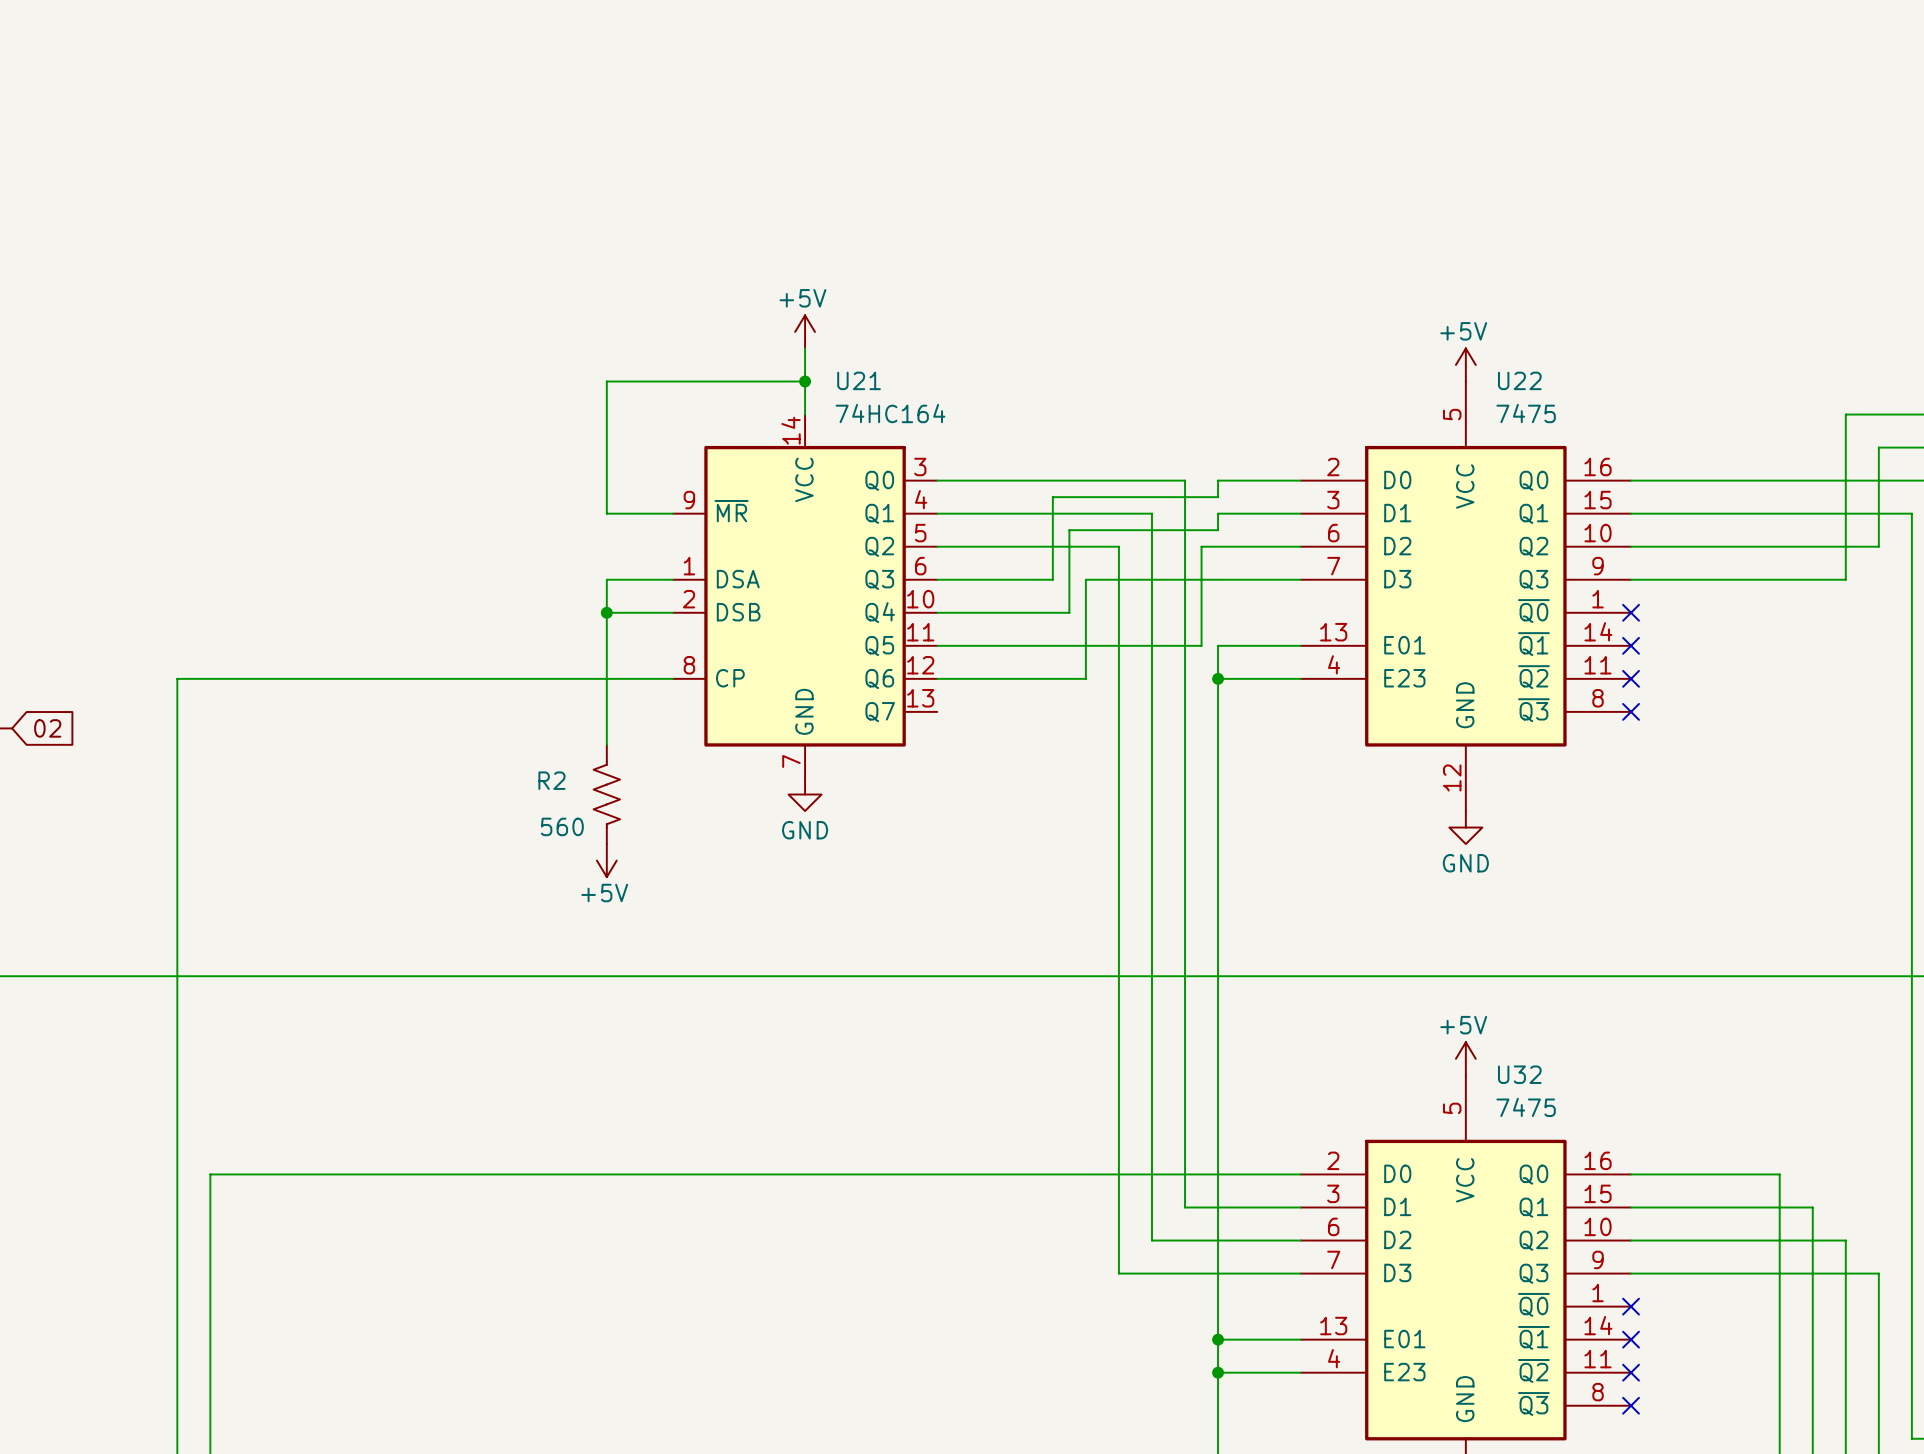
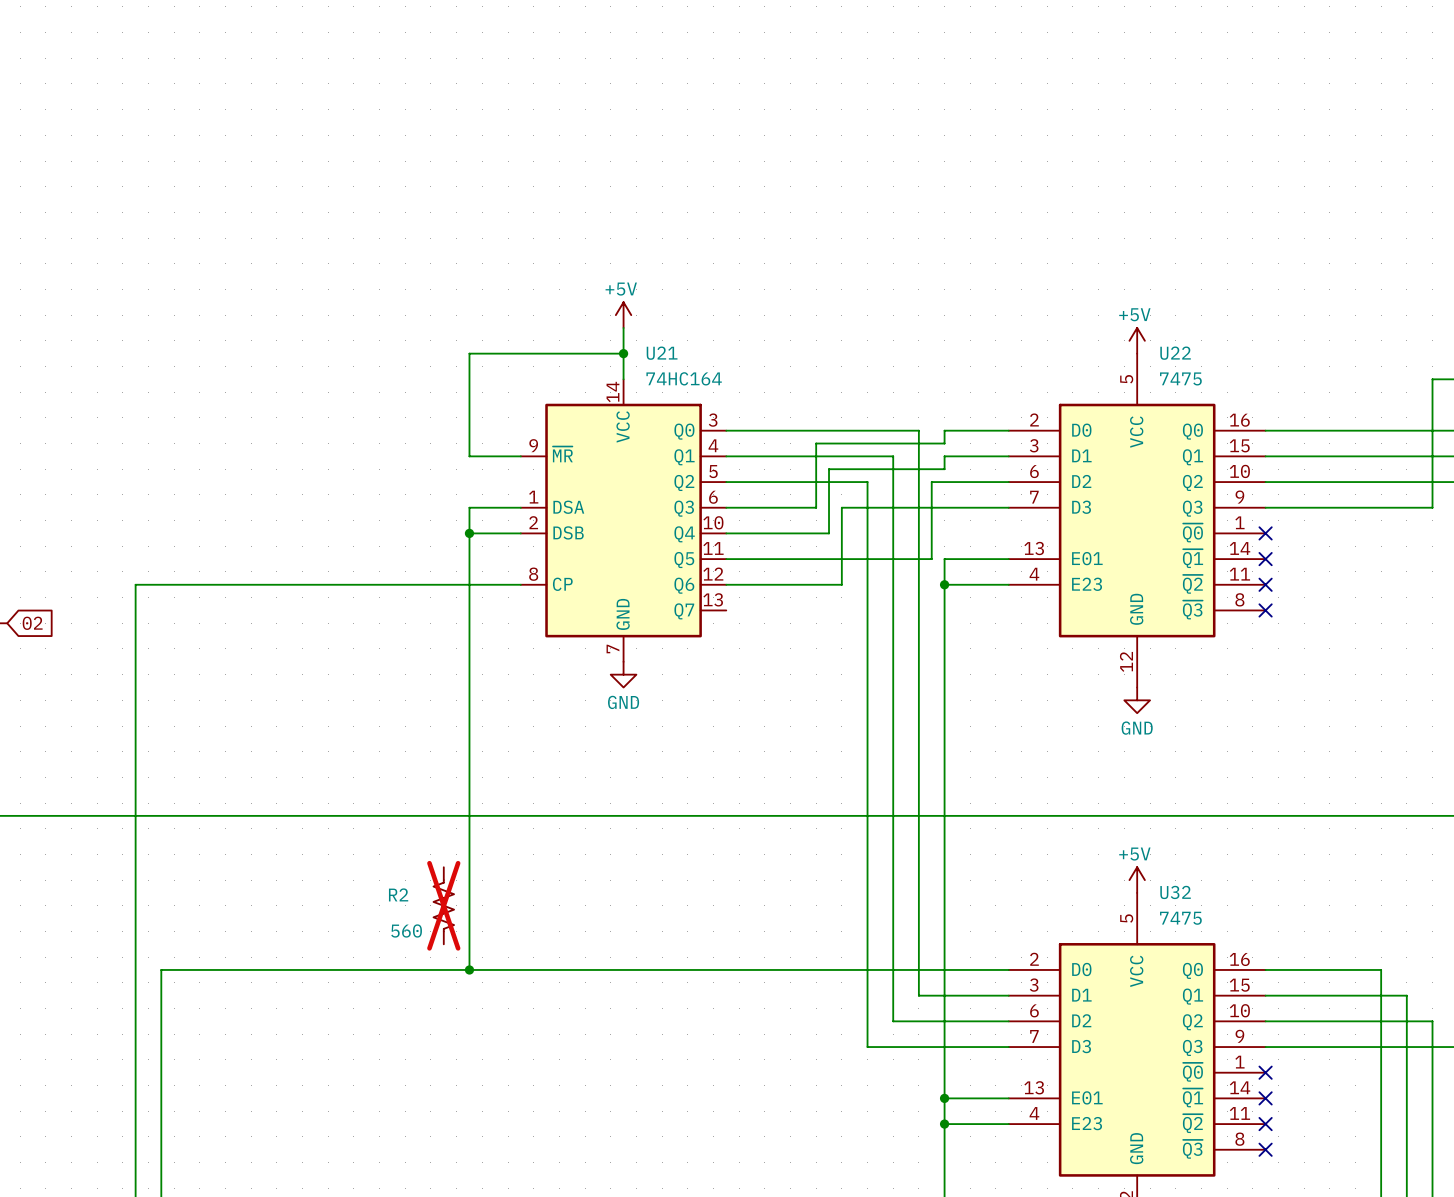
wire: none -> (469, 636) (469, 969)
R2 position: (606, 794) -> (443, 905)
power symbol: +5V (606, 860) -> none
R2 do-not-place cross: none -> (443, 905)
junction: none -> (469, 969)

